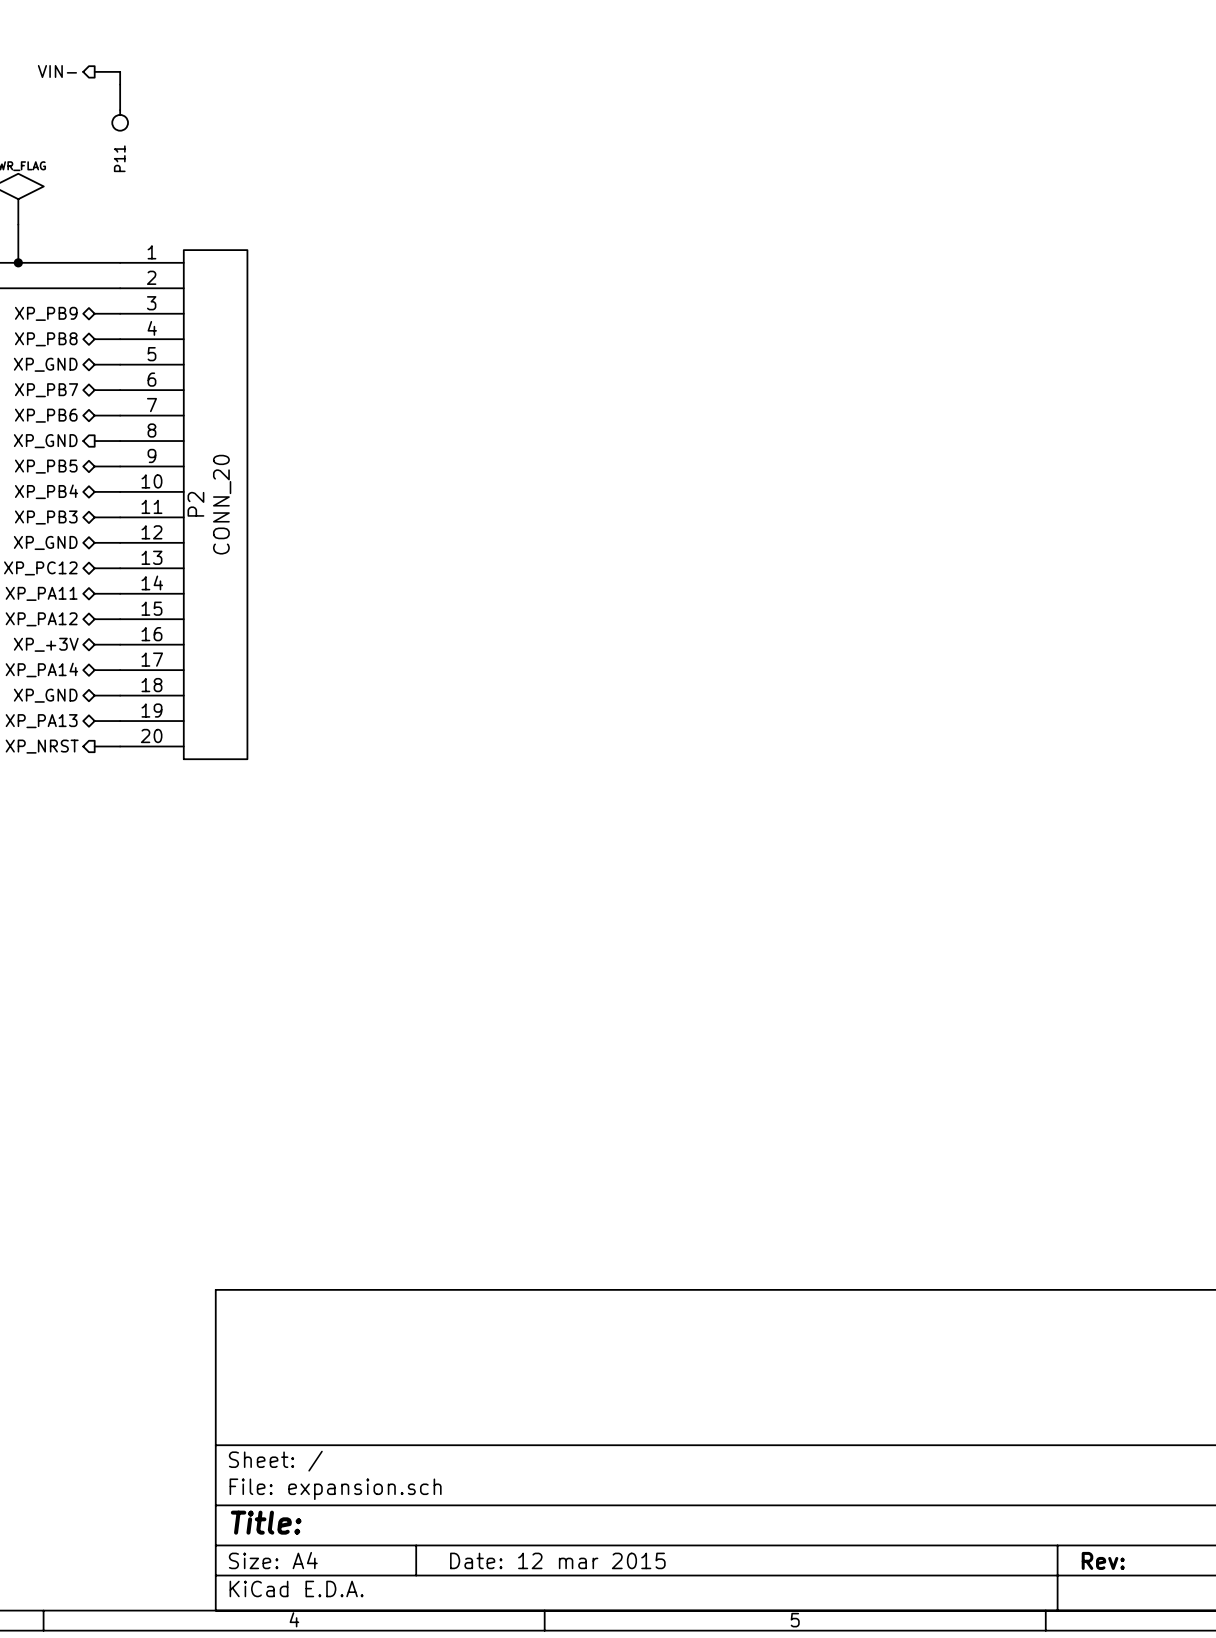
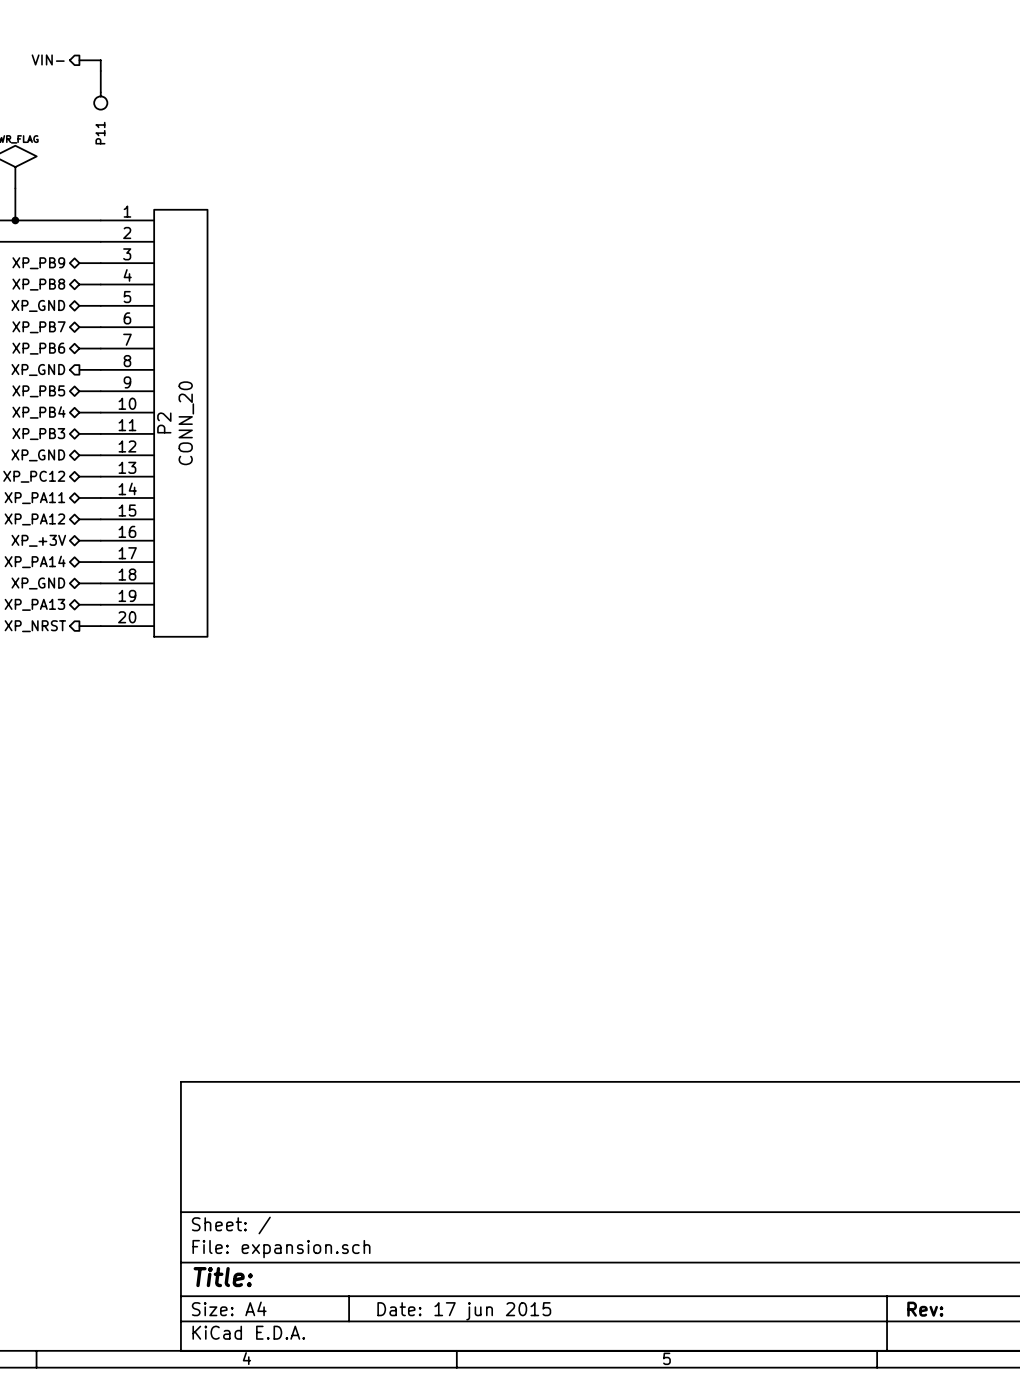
title block: Date: 12 mar 2015 (557, 1560) -> Date: 17 jun 2015 (464, 1311)

